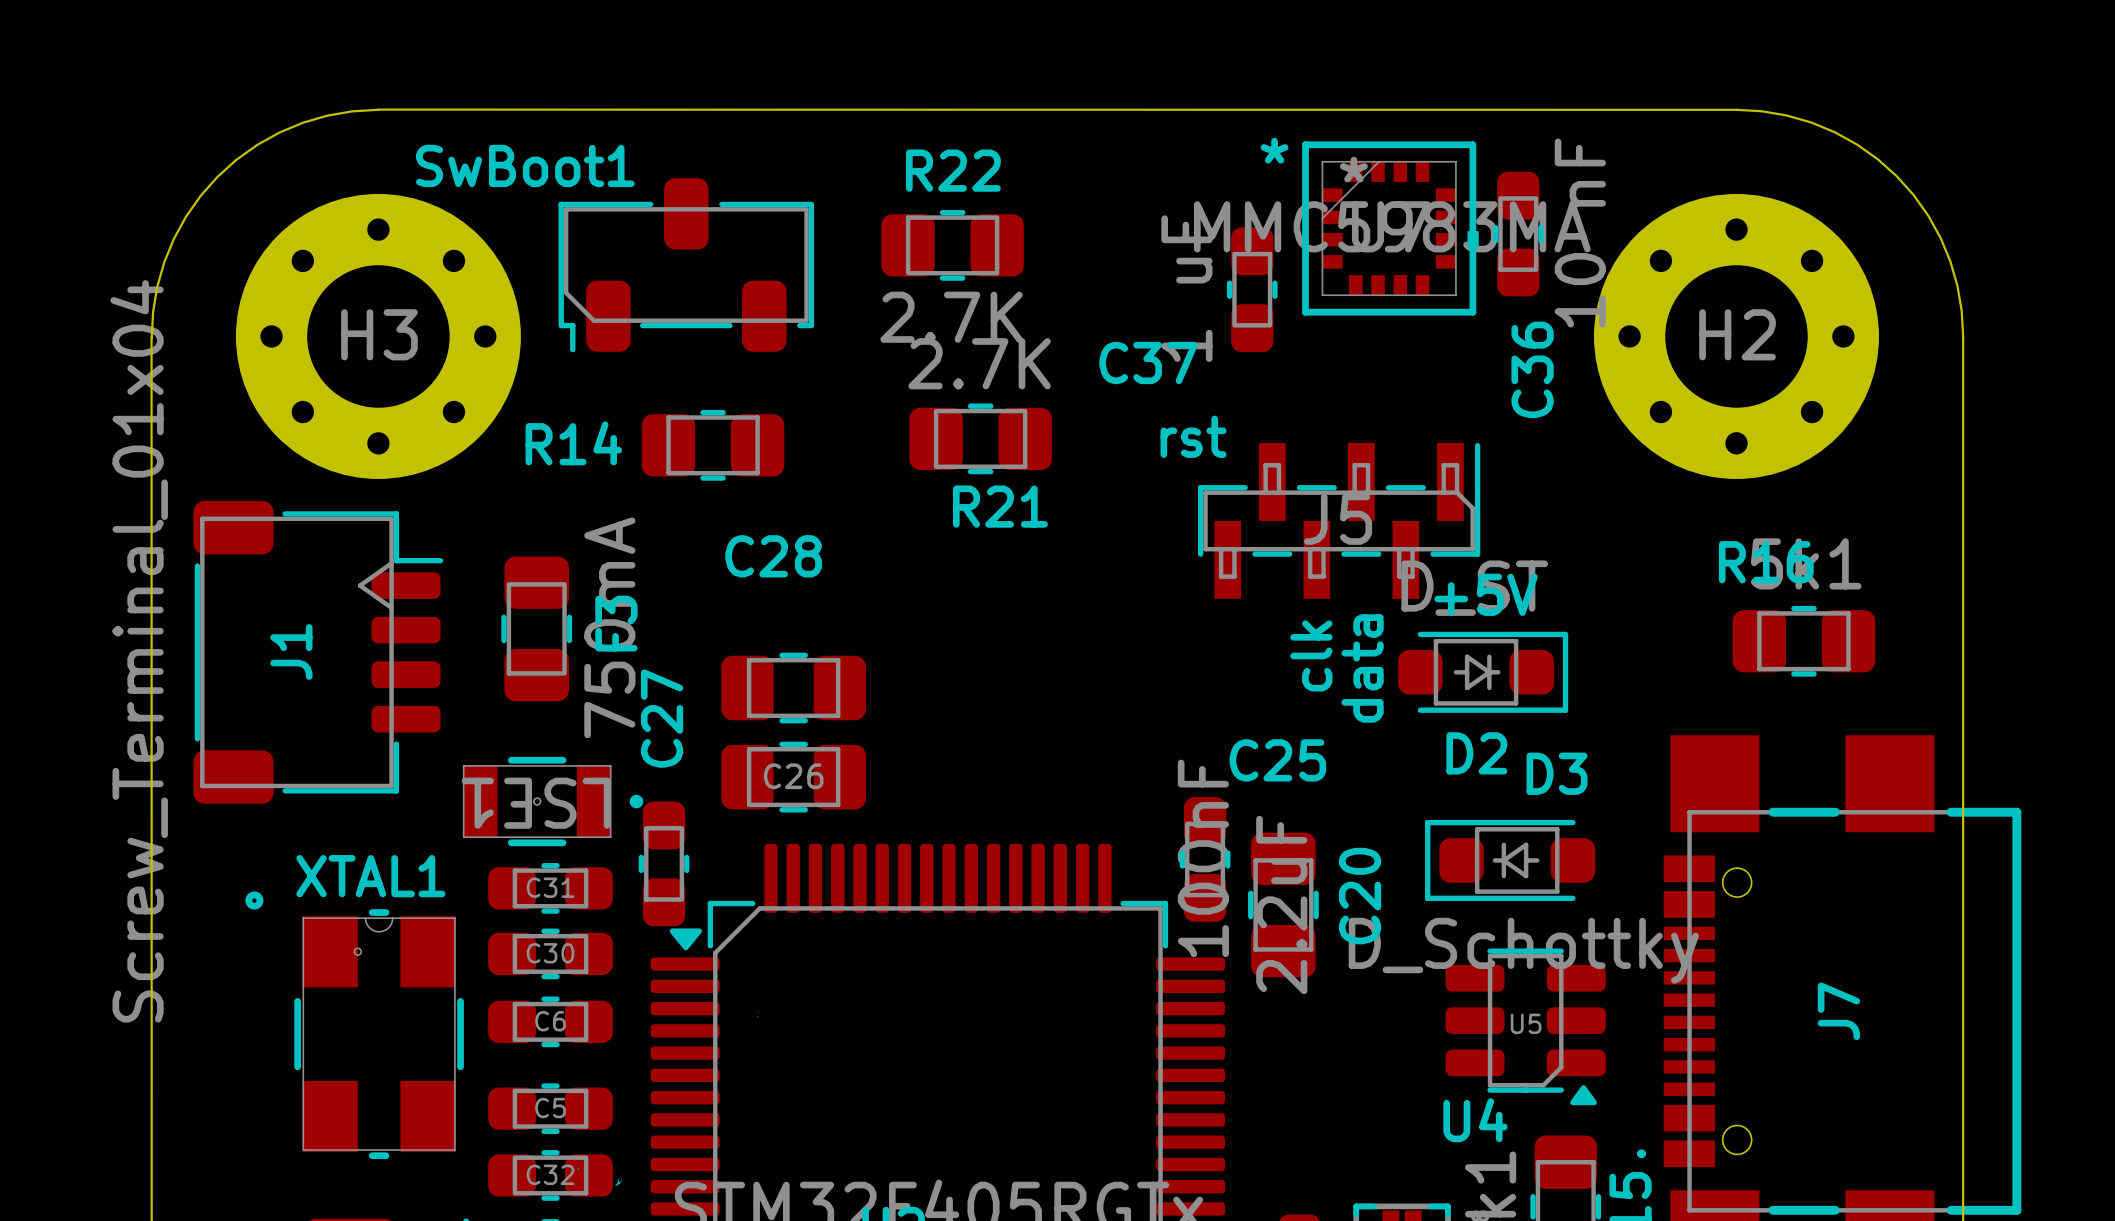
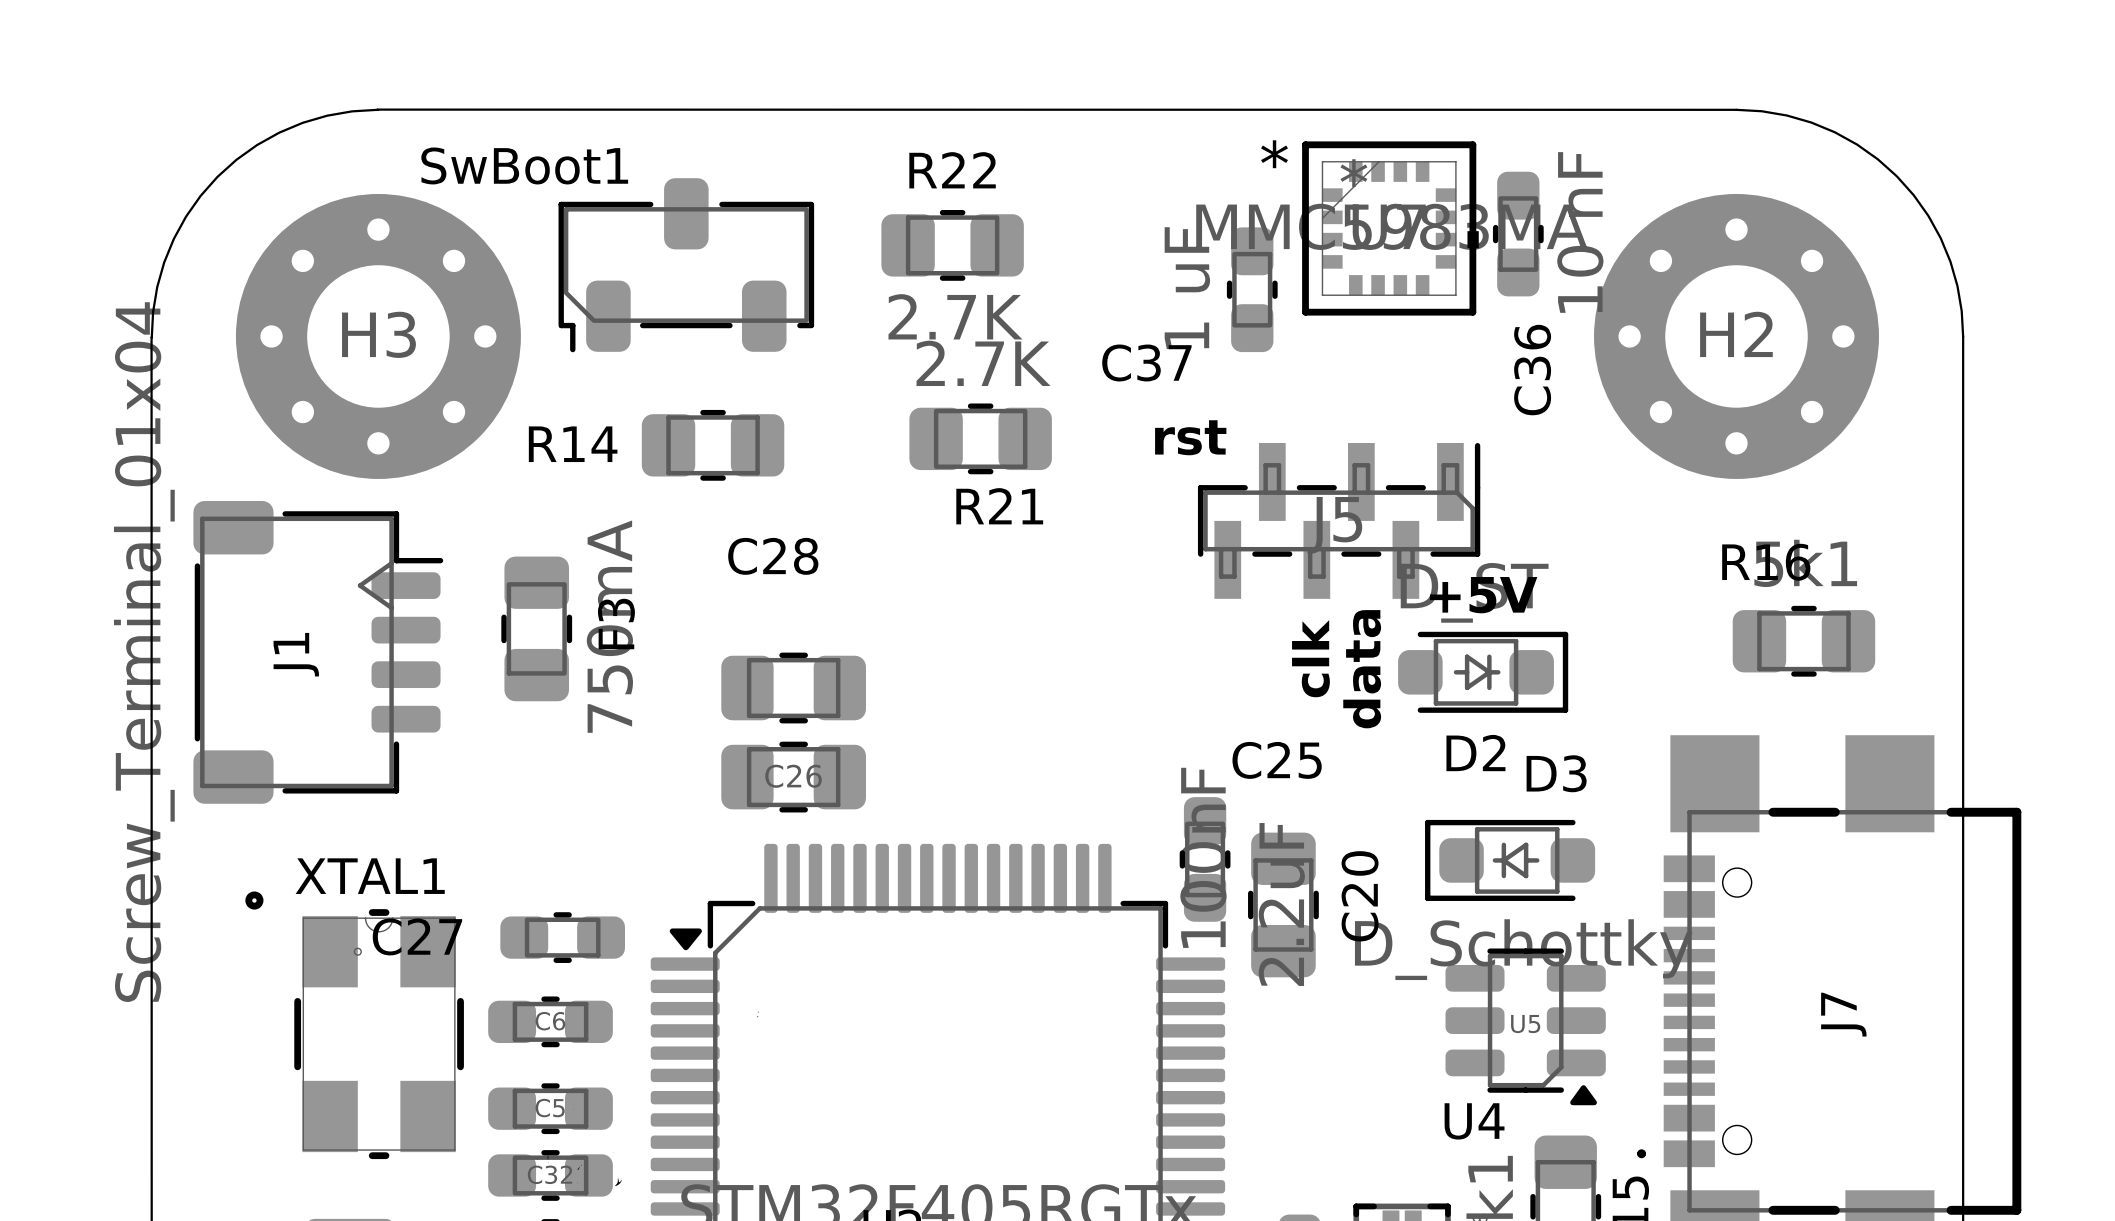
C27 name position: C27 (662, 718) -> C27 (417, 936)
LSE1: (553, 801) -> none
C27 rotation: 0° (664, 863) -> 90° clockwise (562, 937)
C27 position: (664, 863) -> (562, 937)
C31: (550, 888) -> none
C30: (550, 953) -> none

